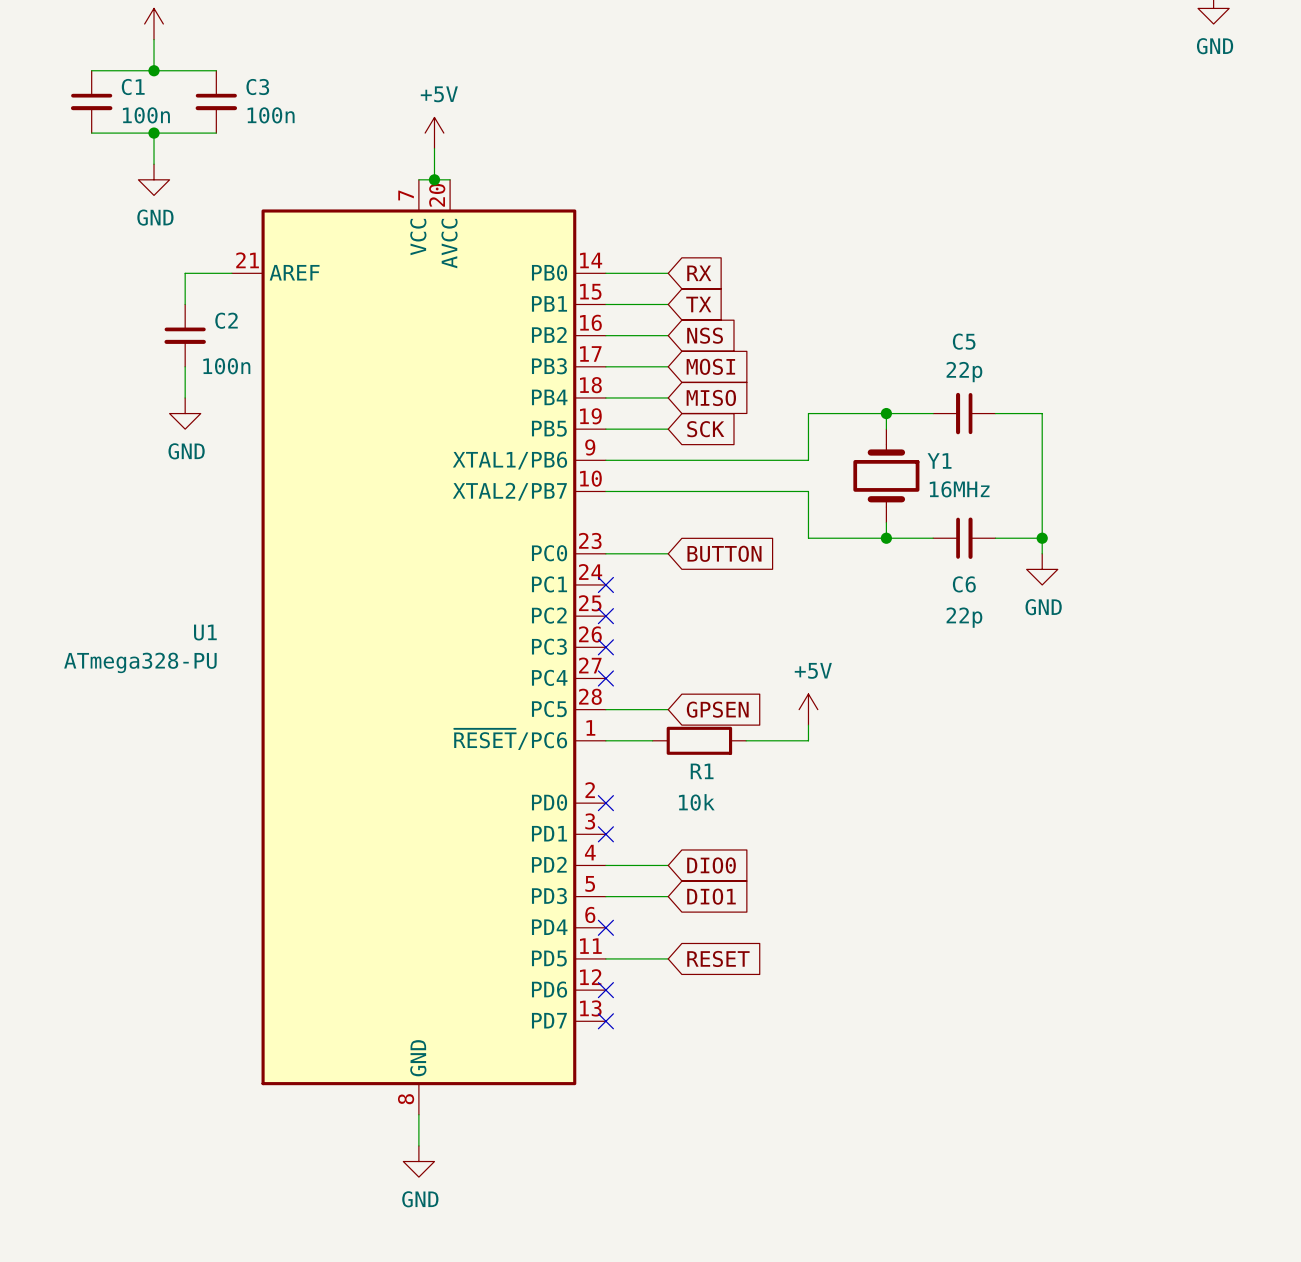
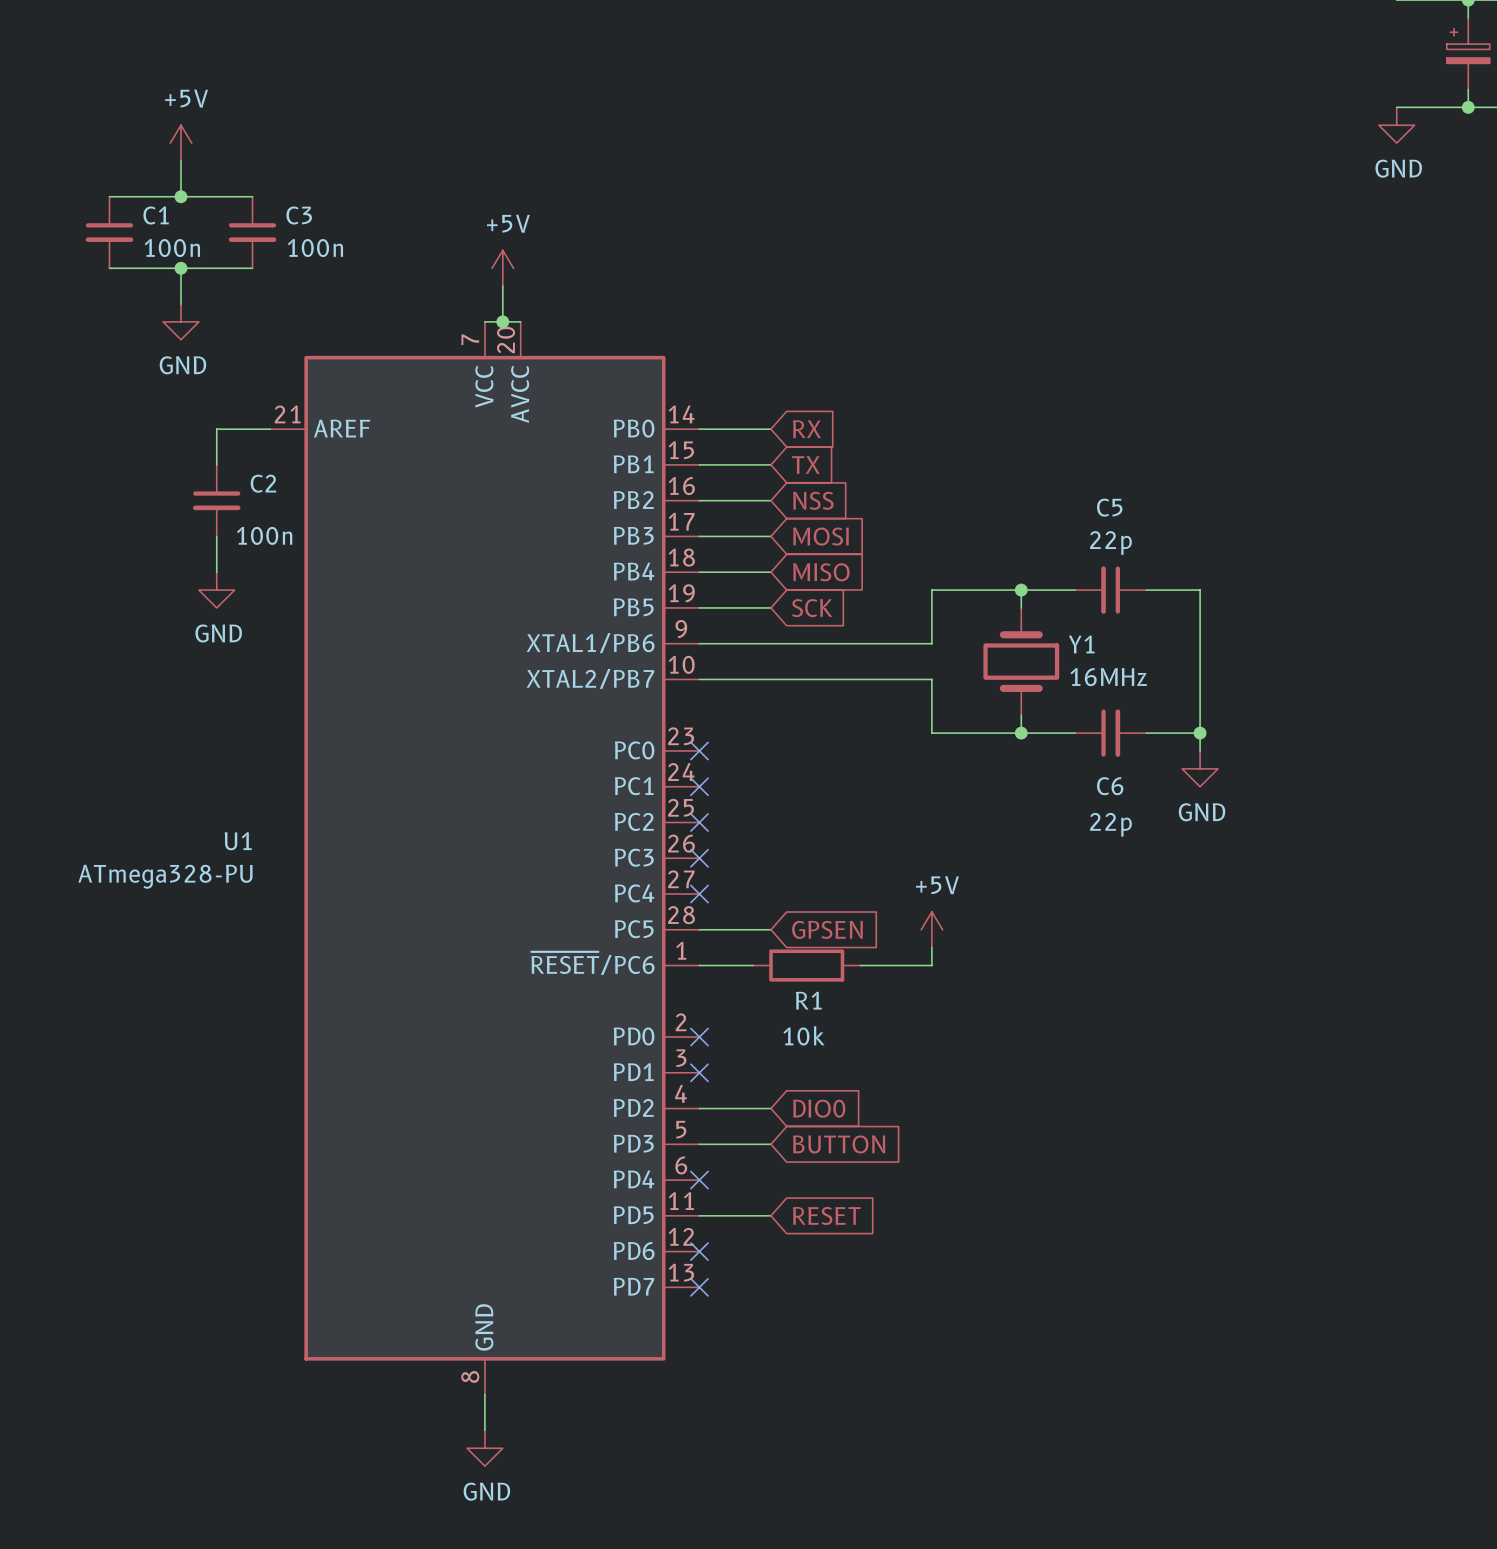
wire: (605, 553) (668, 553) -> none
no-connect mark: none -> (699, 750)
global label: BUTTON (724, 553) -> none
global label: DIO1 (711, 896) -> BUTTON (839, 1144)

